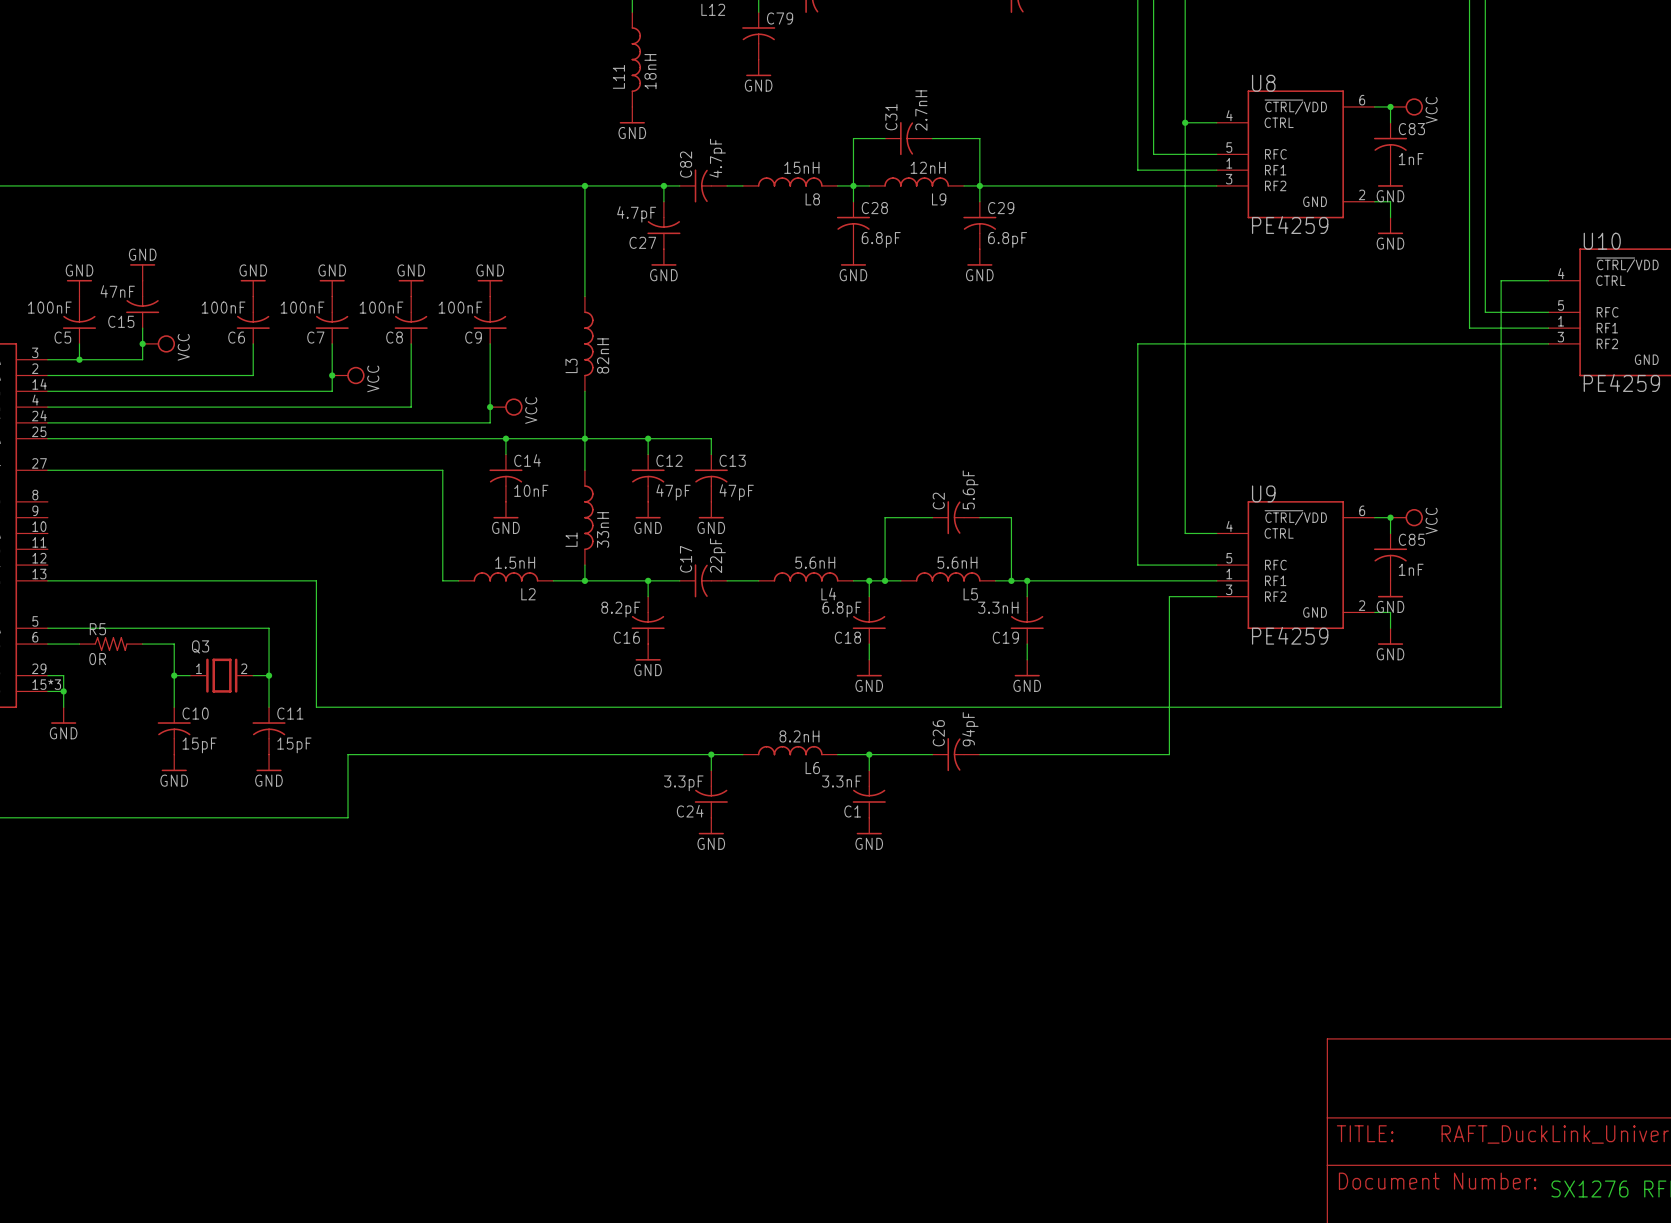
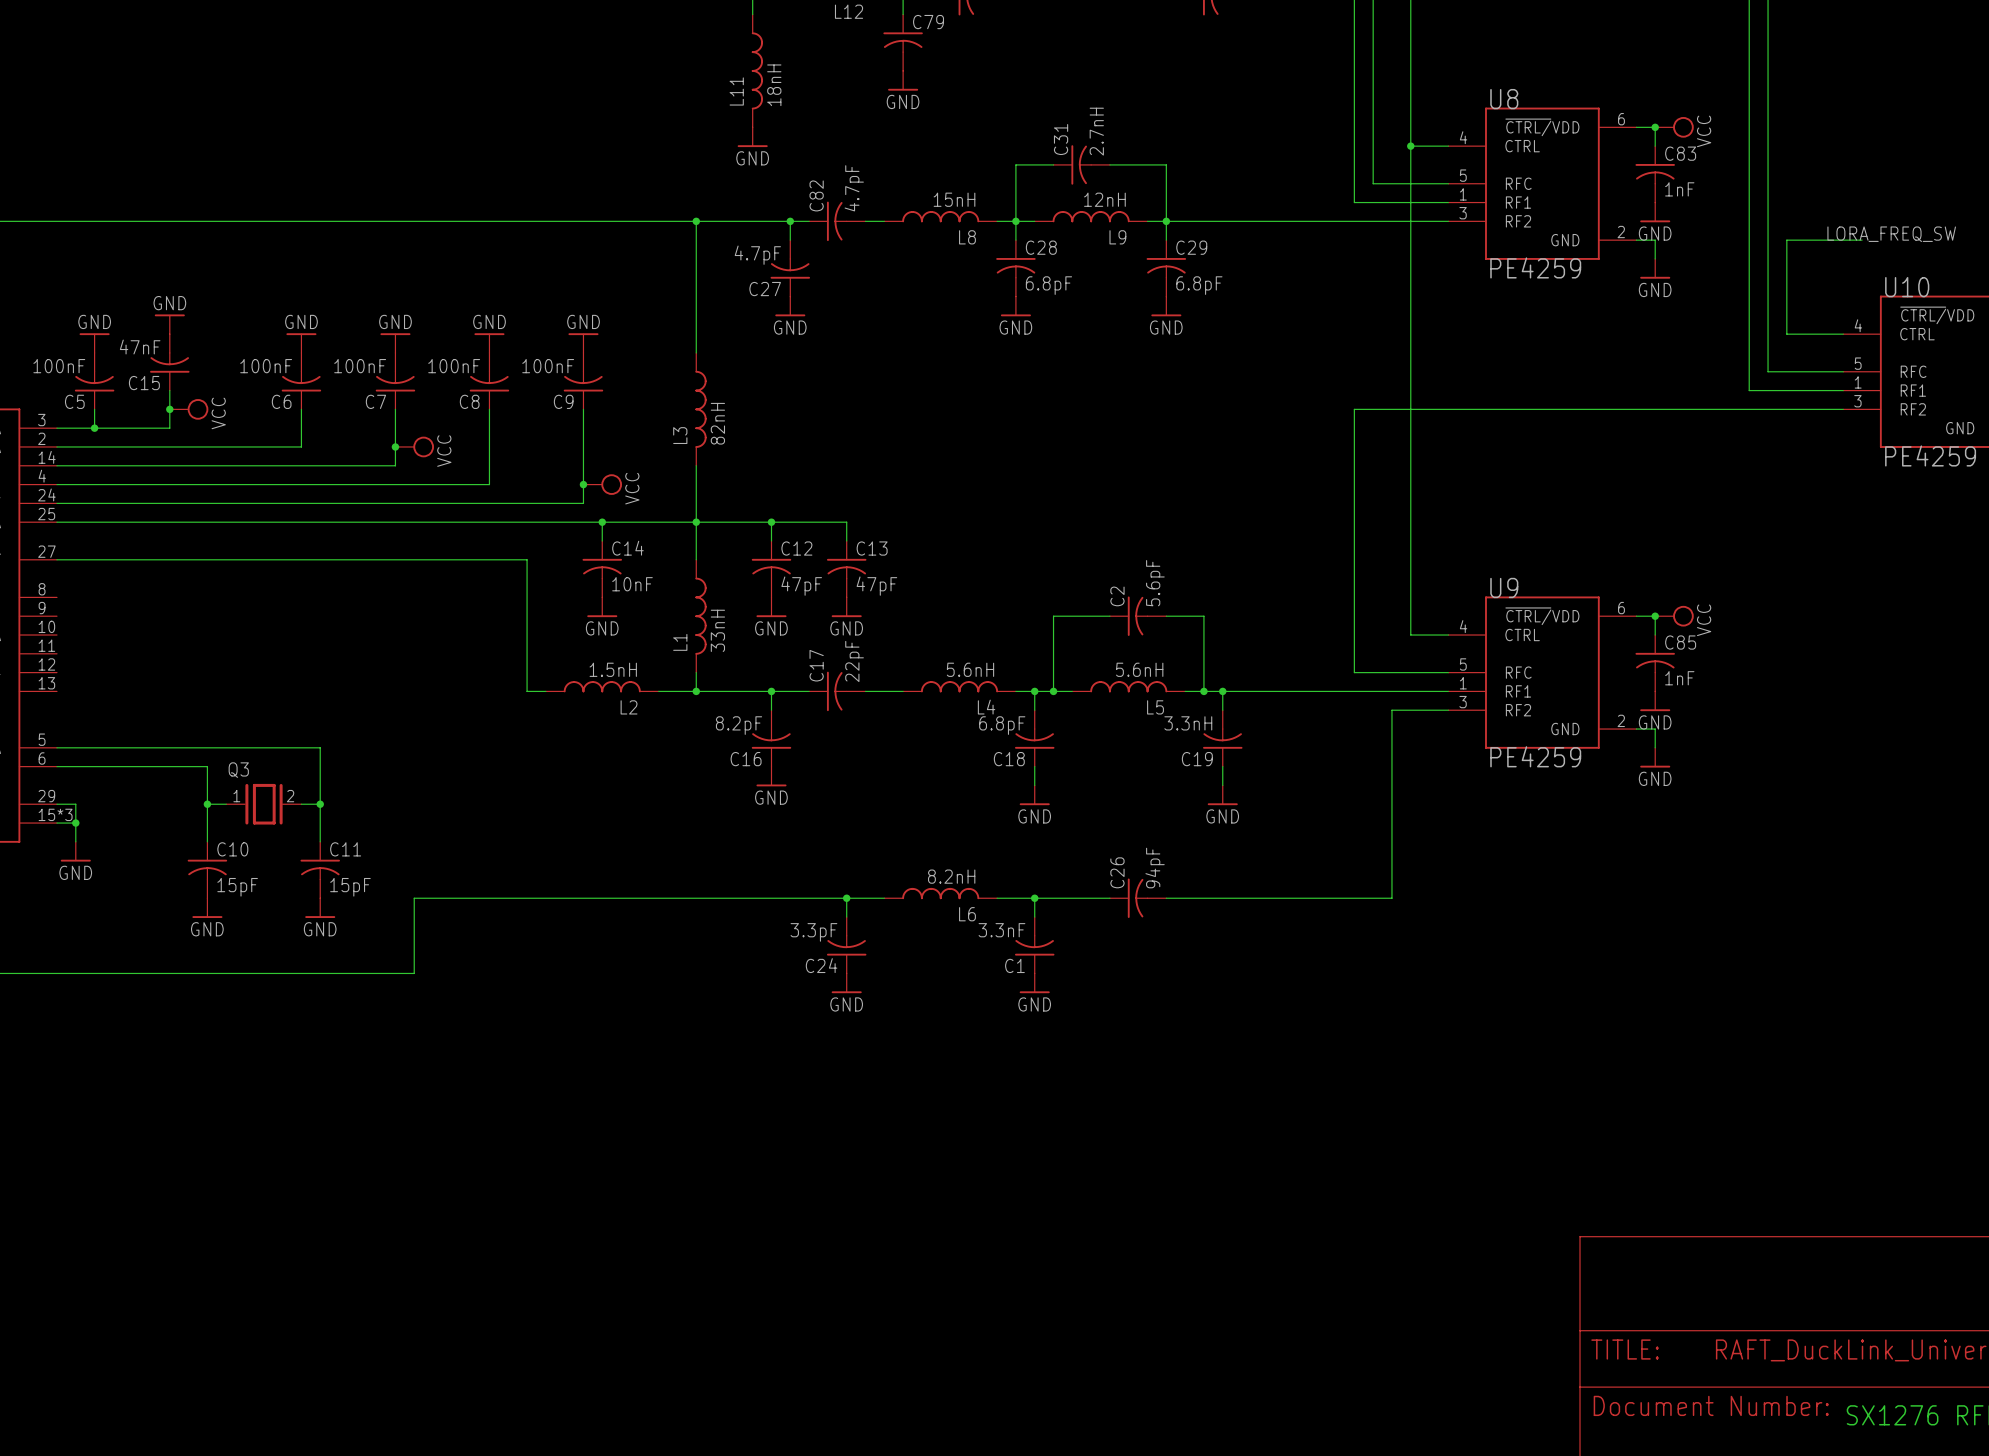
label: none -> LORA_FREQ_SW (1891, 234)
wire: (1501, 280) (1501, 707) (316, 707) (316, 580) (47, 580) -> (1786, 334) (1786, 240) (1862, 240)
R5: 0R (111, 644) -> none

